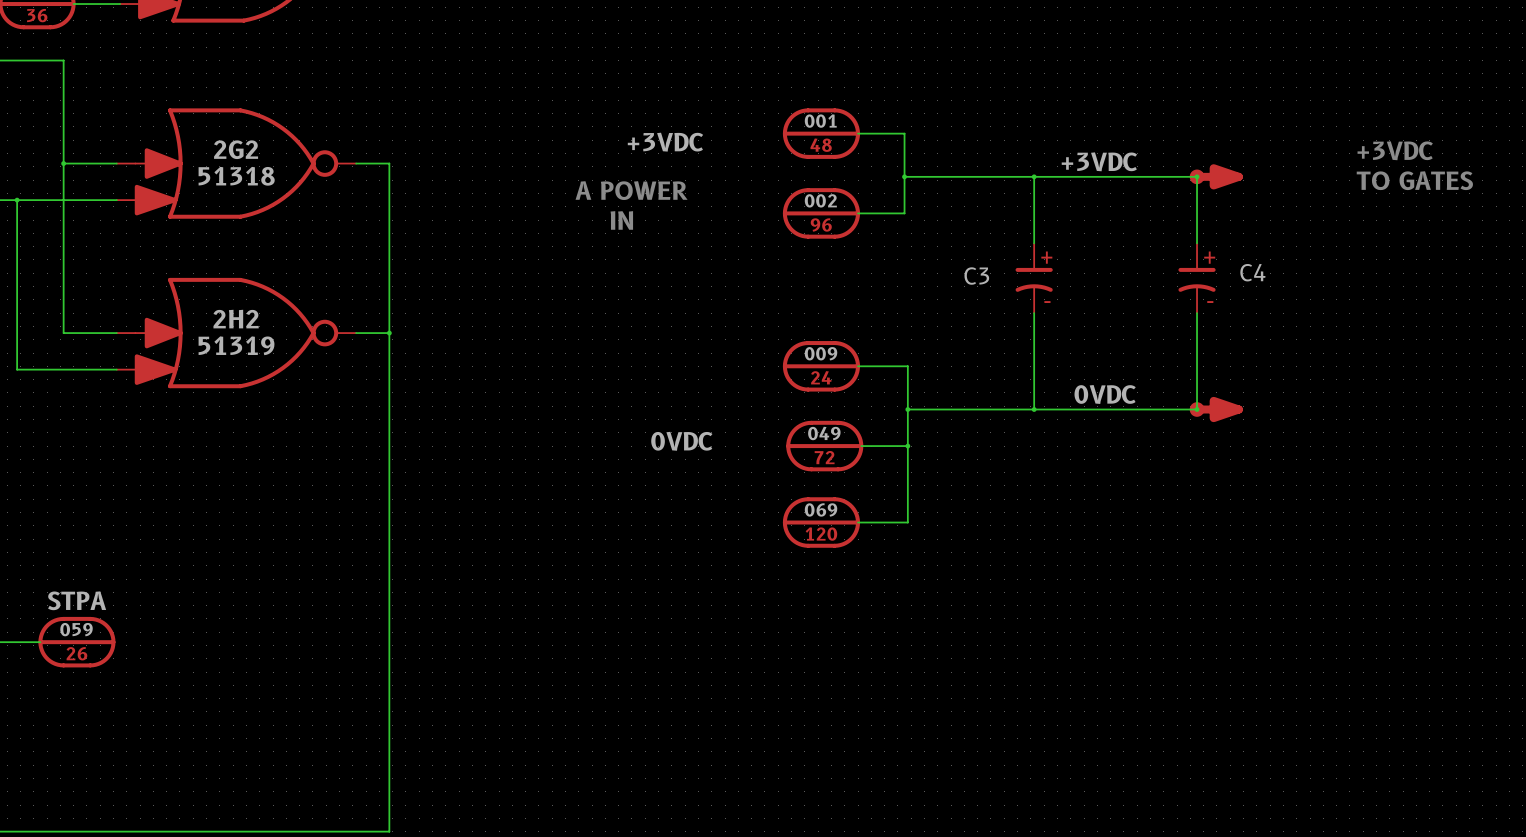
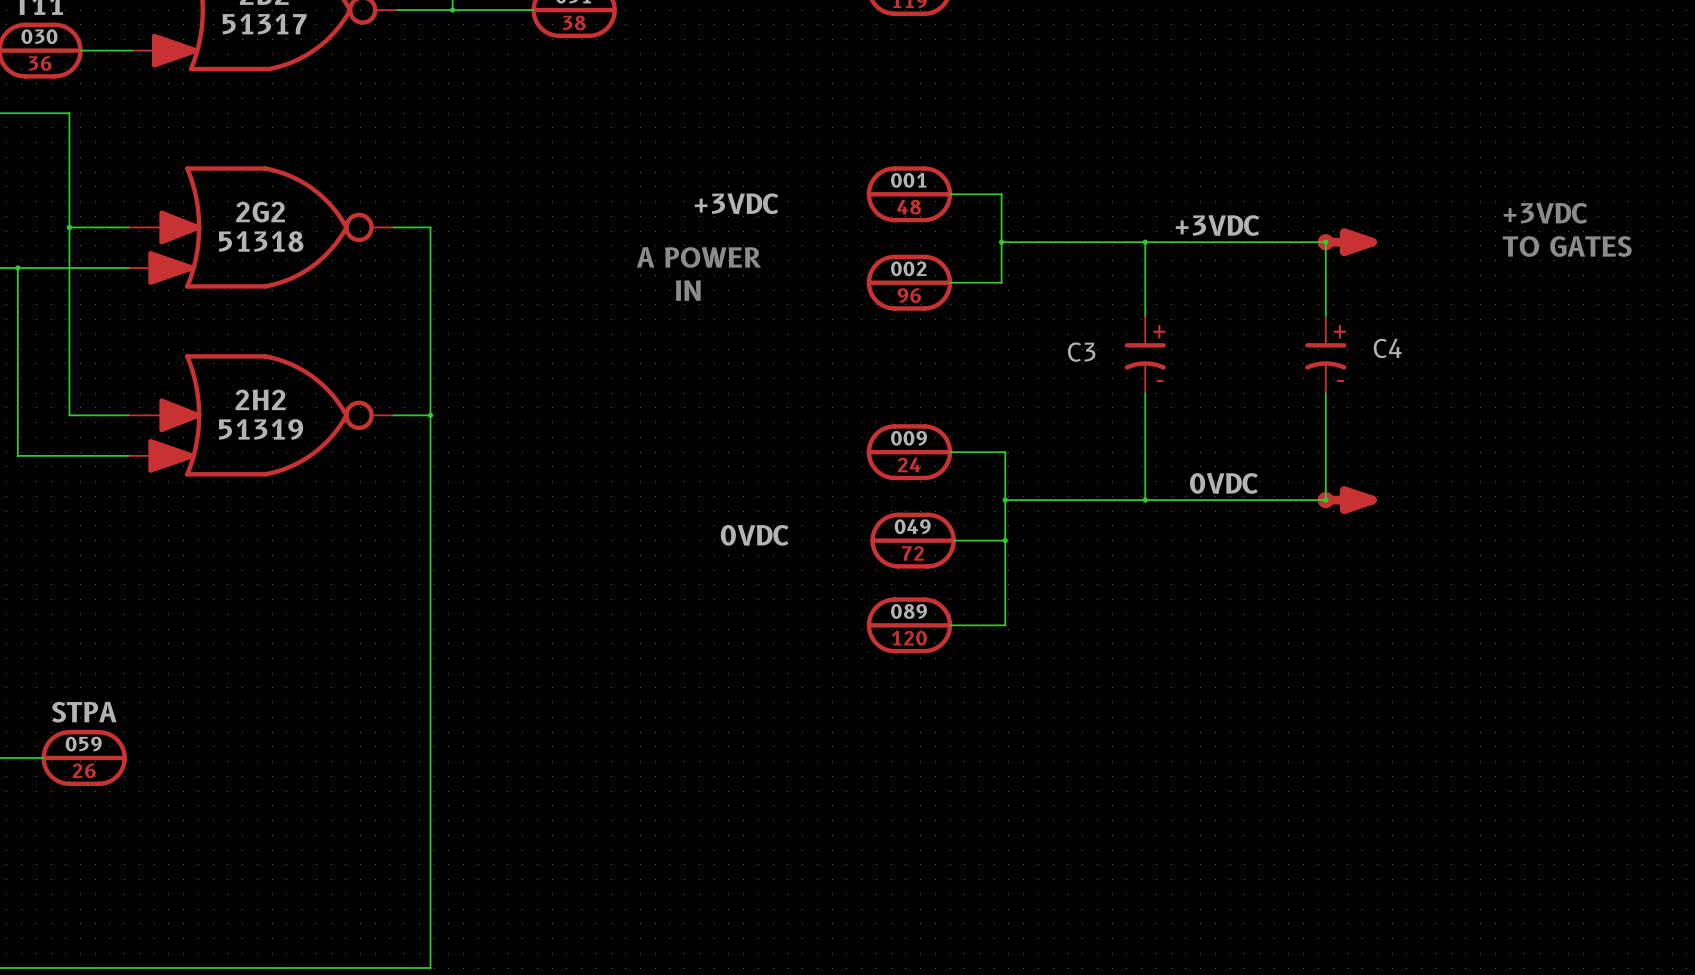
part text: 069 (821, 509) -> 089 (909, 611)

